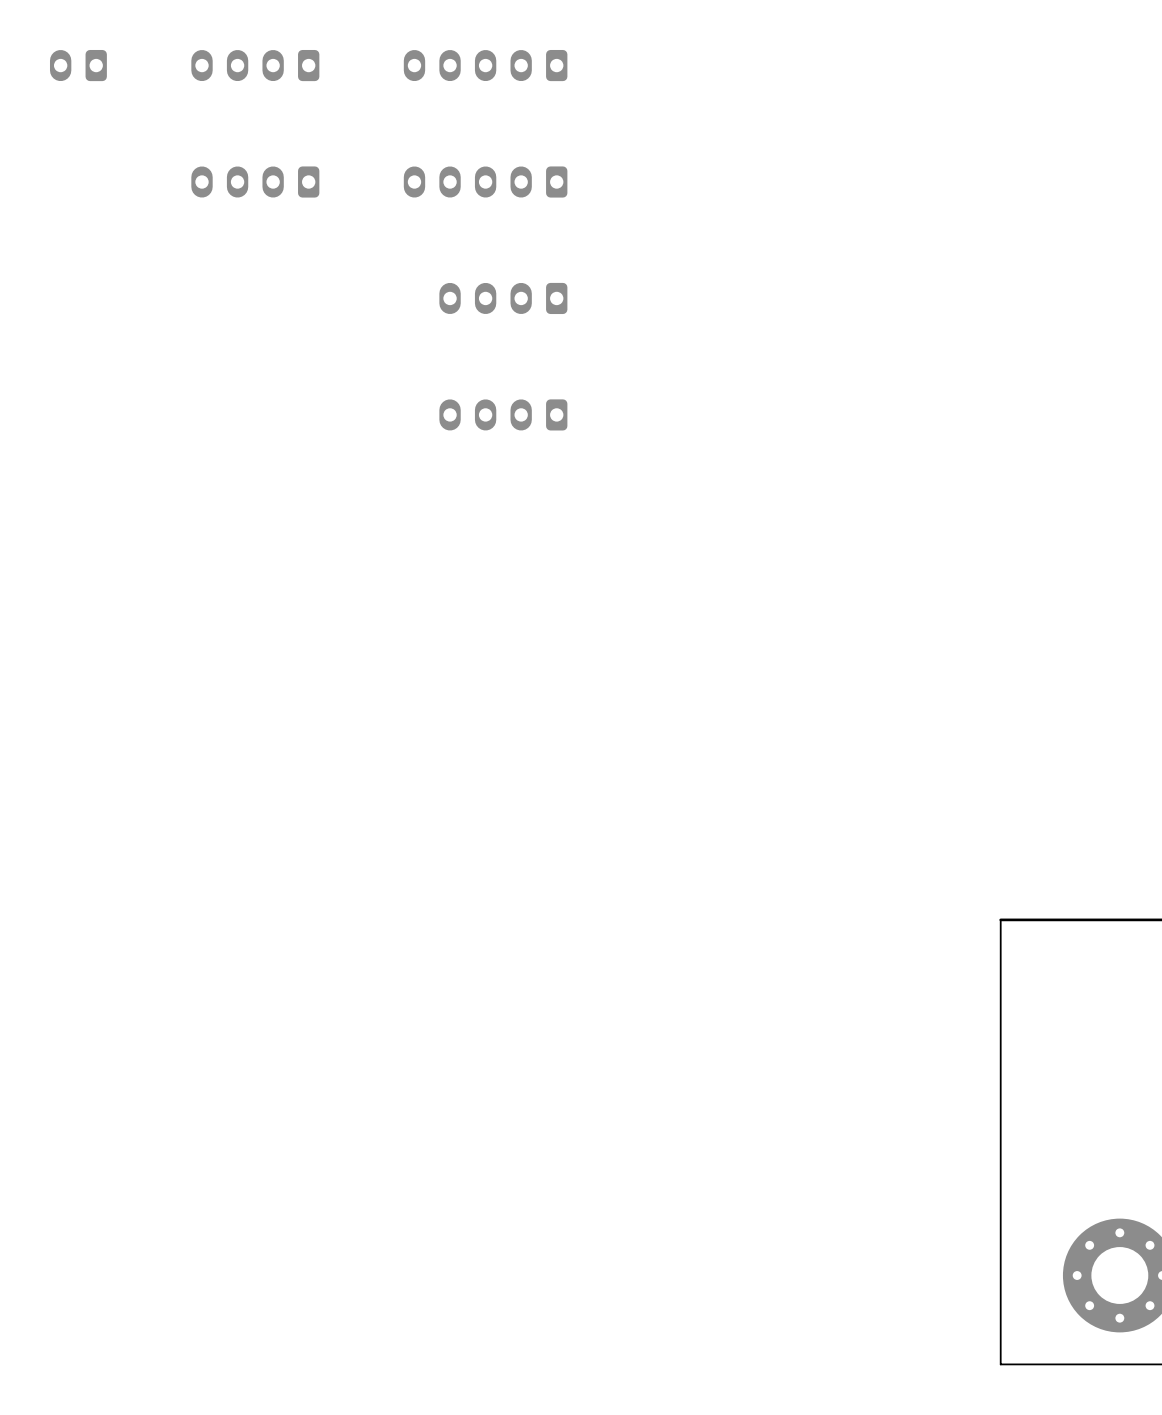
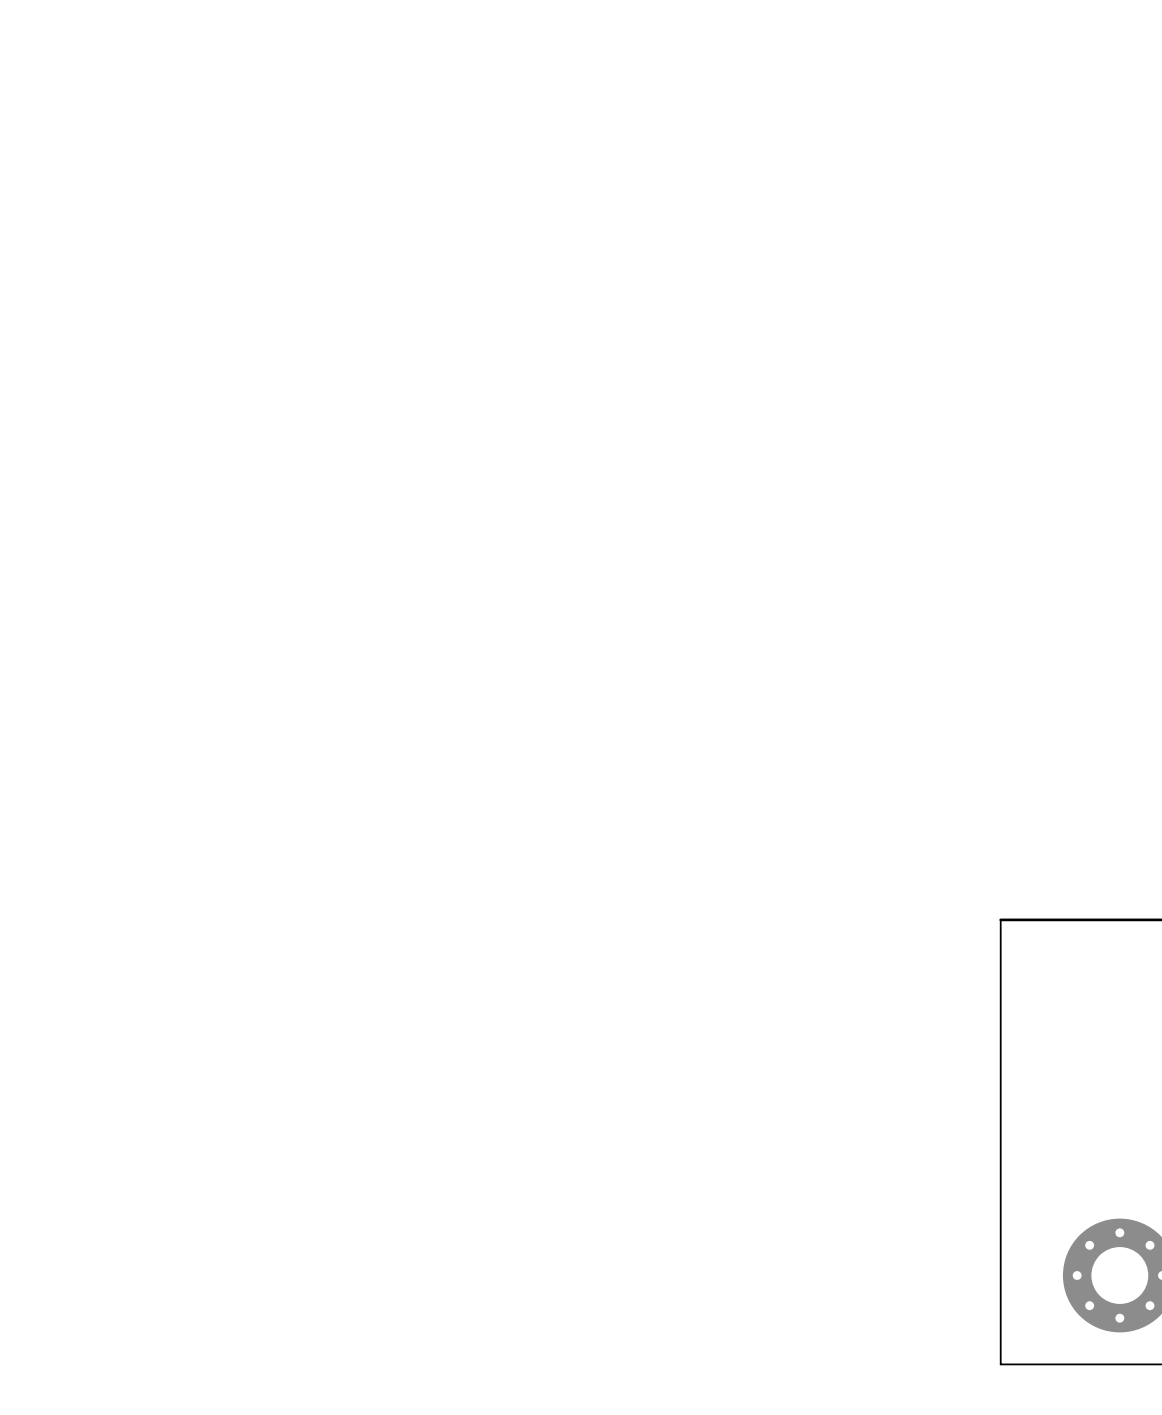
part: (78, 65) -> none
part: (255, 65) -> none
part: (485, 65) -> none
part: (255, 182) -> none
part: (485, 182) -> none
part: (503, 298) -> none
part: (503, 414) -> none

